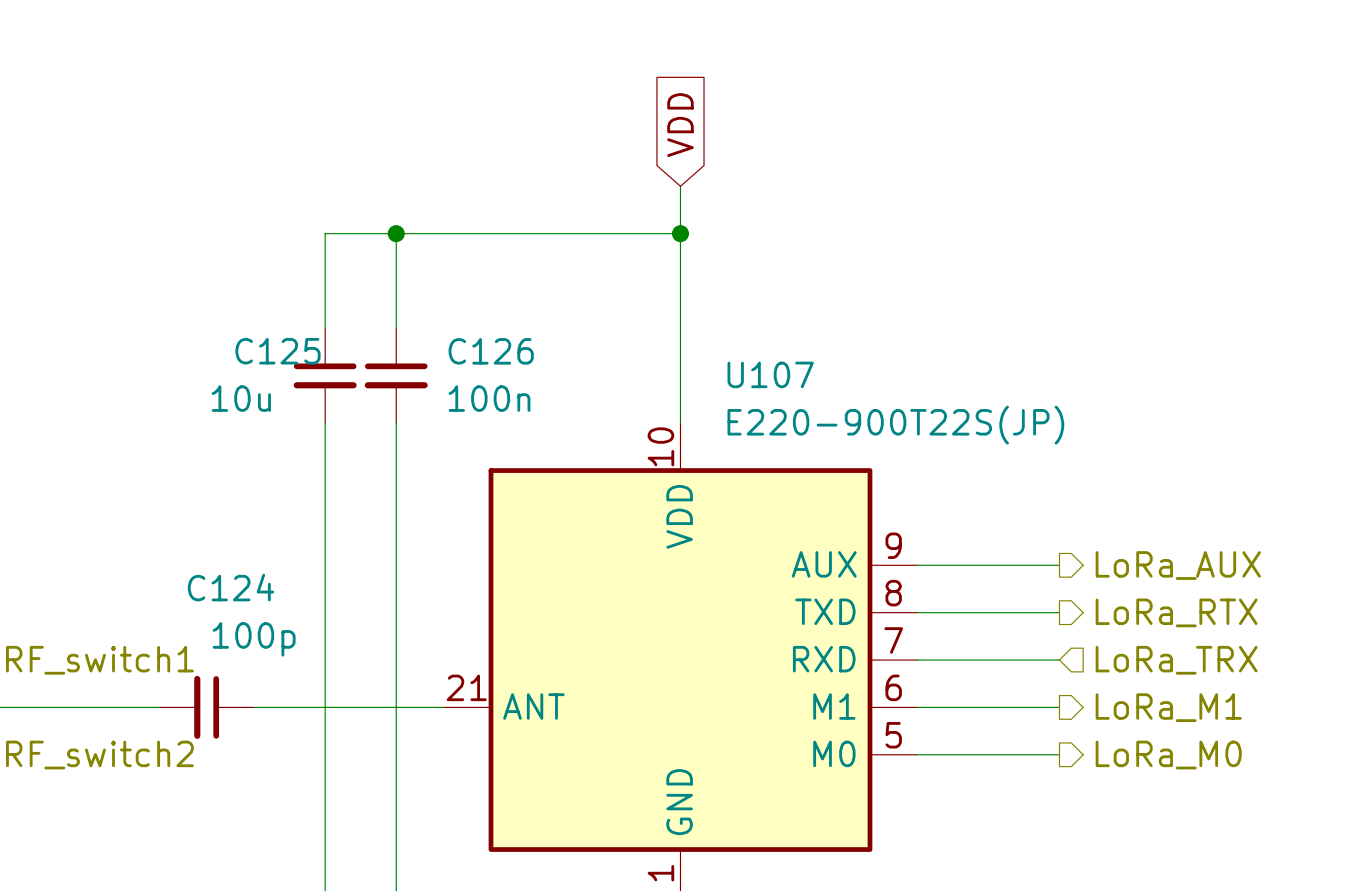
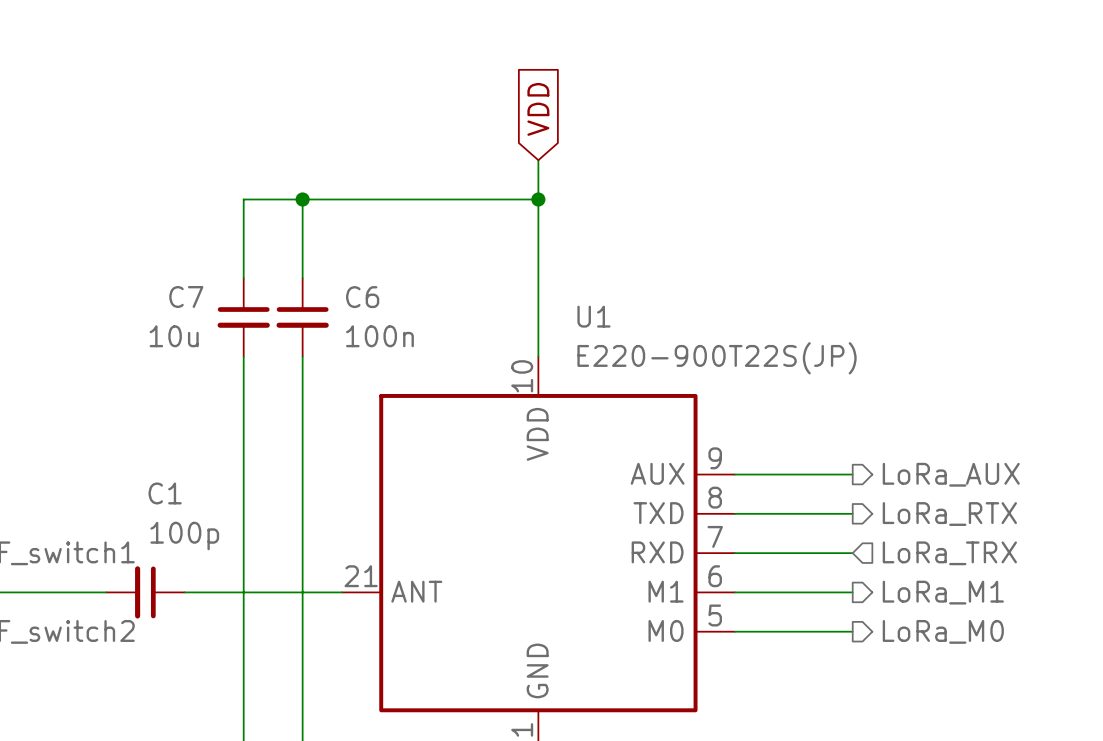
C125 name: C125 (277, 351) -> C7 (186, 296)
C126 name: C126 (491, 351) -> C6 (362, 297)
U107 name: U107 (770, 374) -> U1 (593, 316)
C124 name: C124 (230, 587) -> C1 (165, 493)

